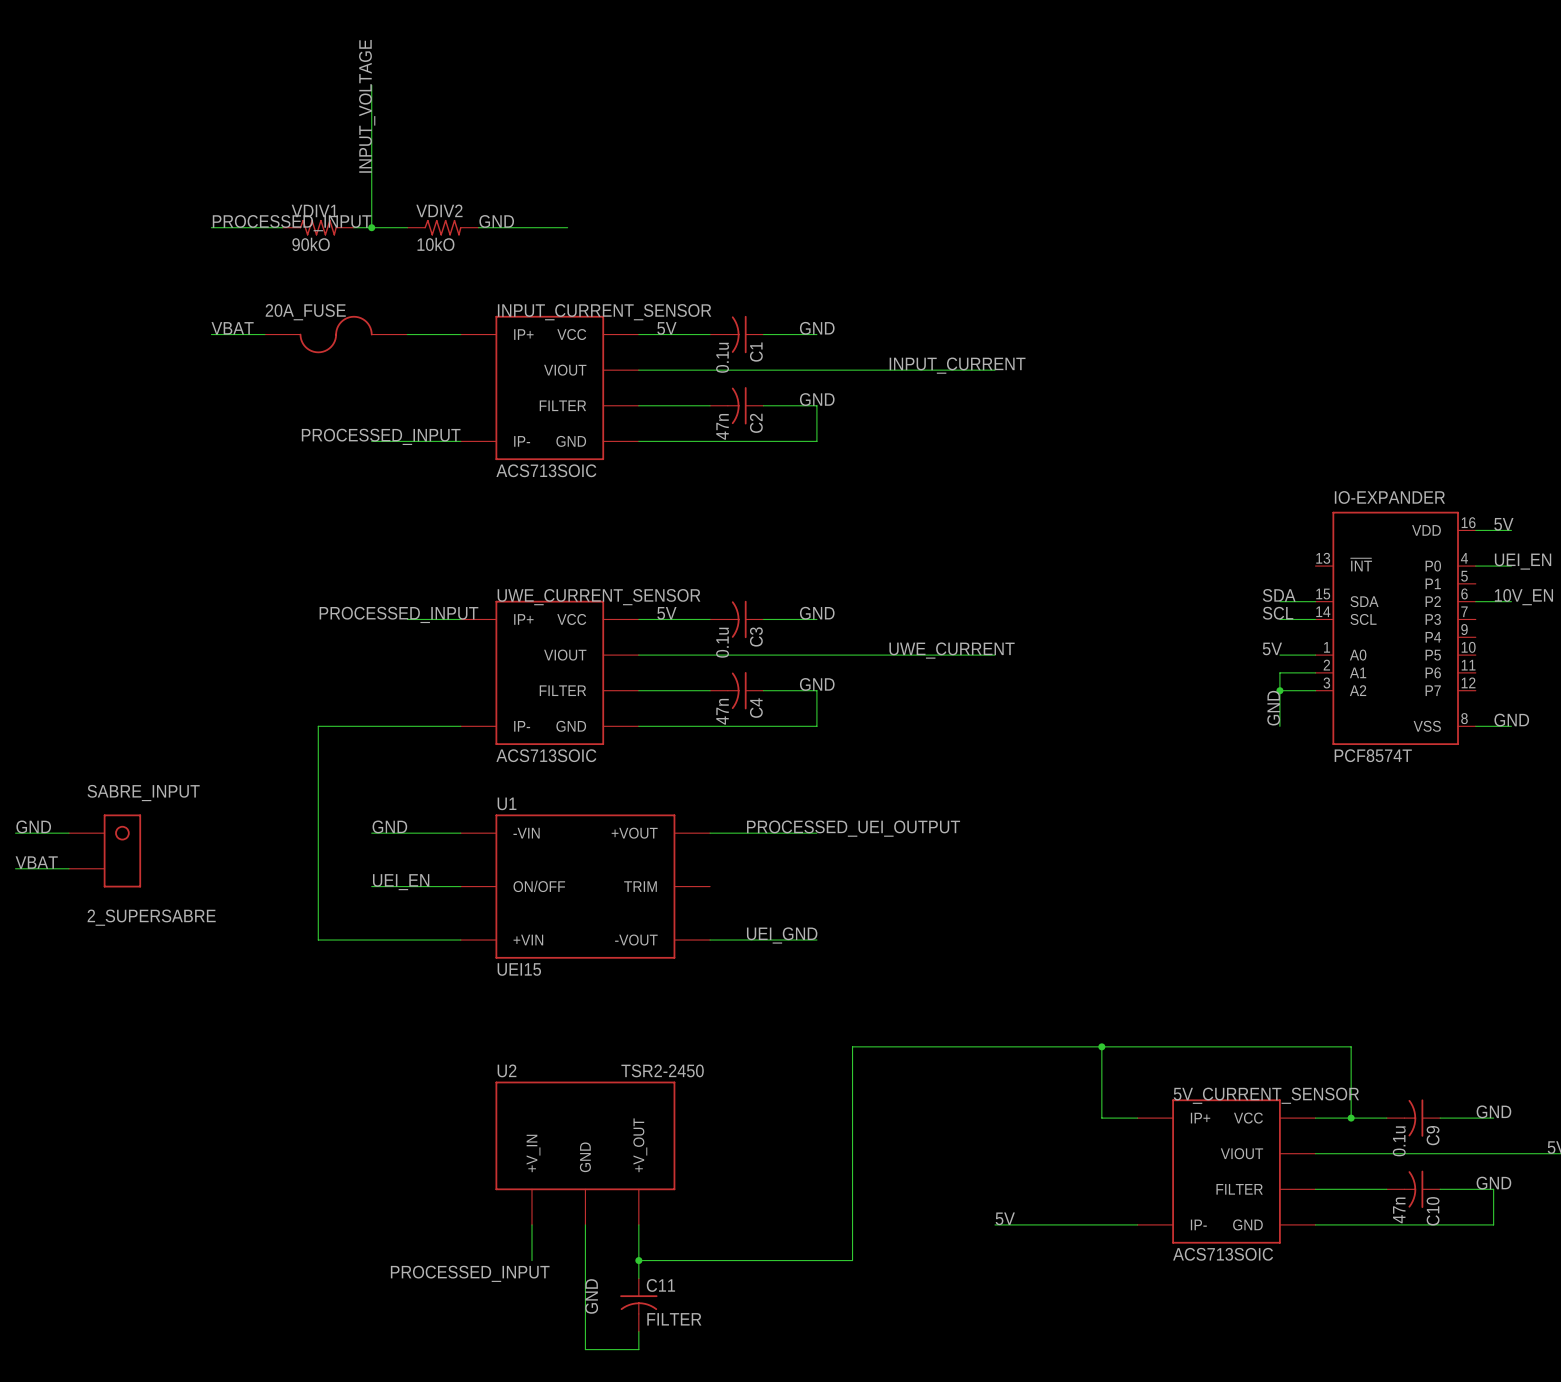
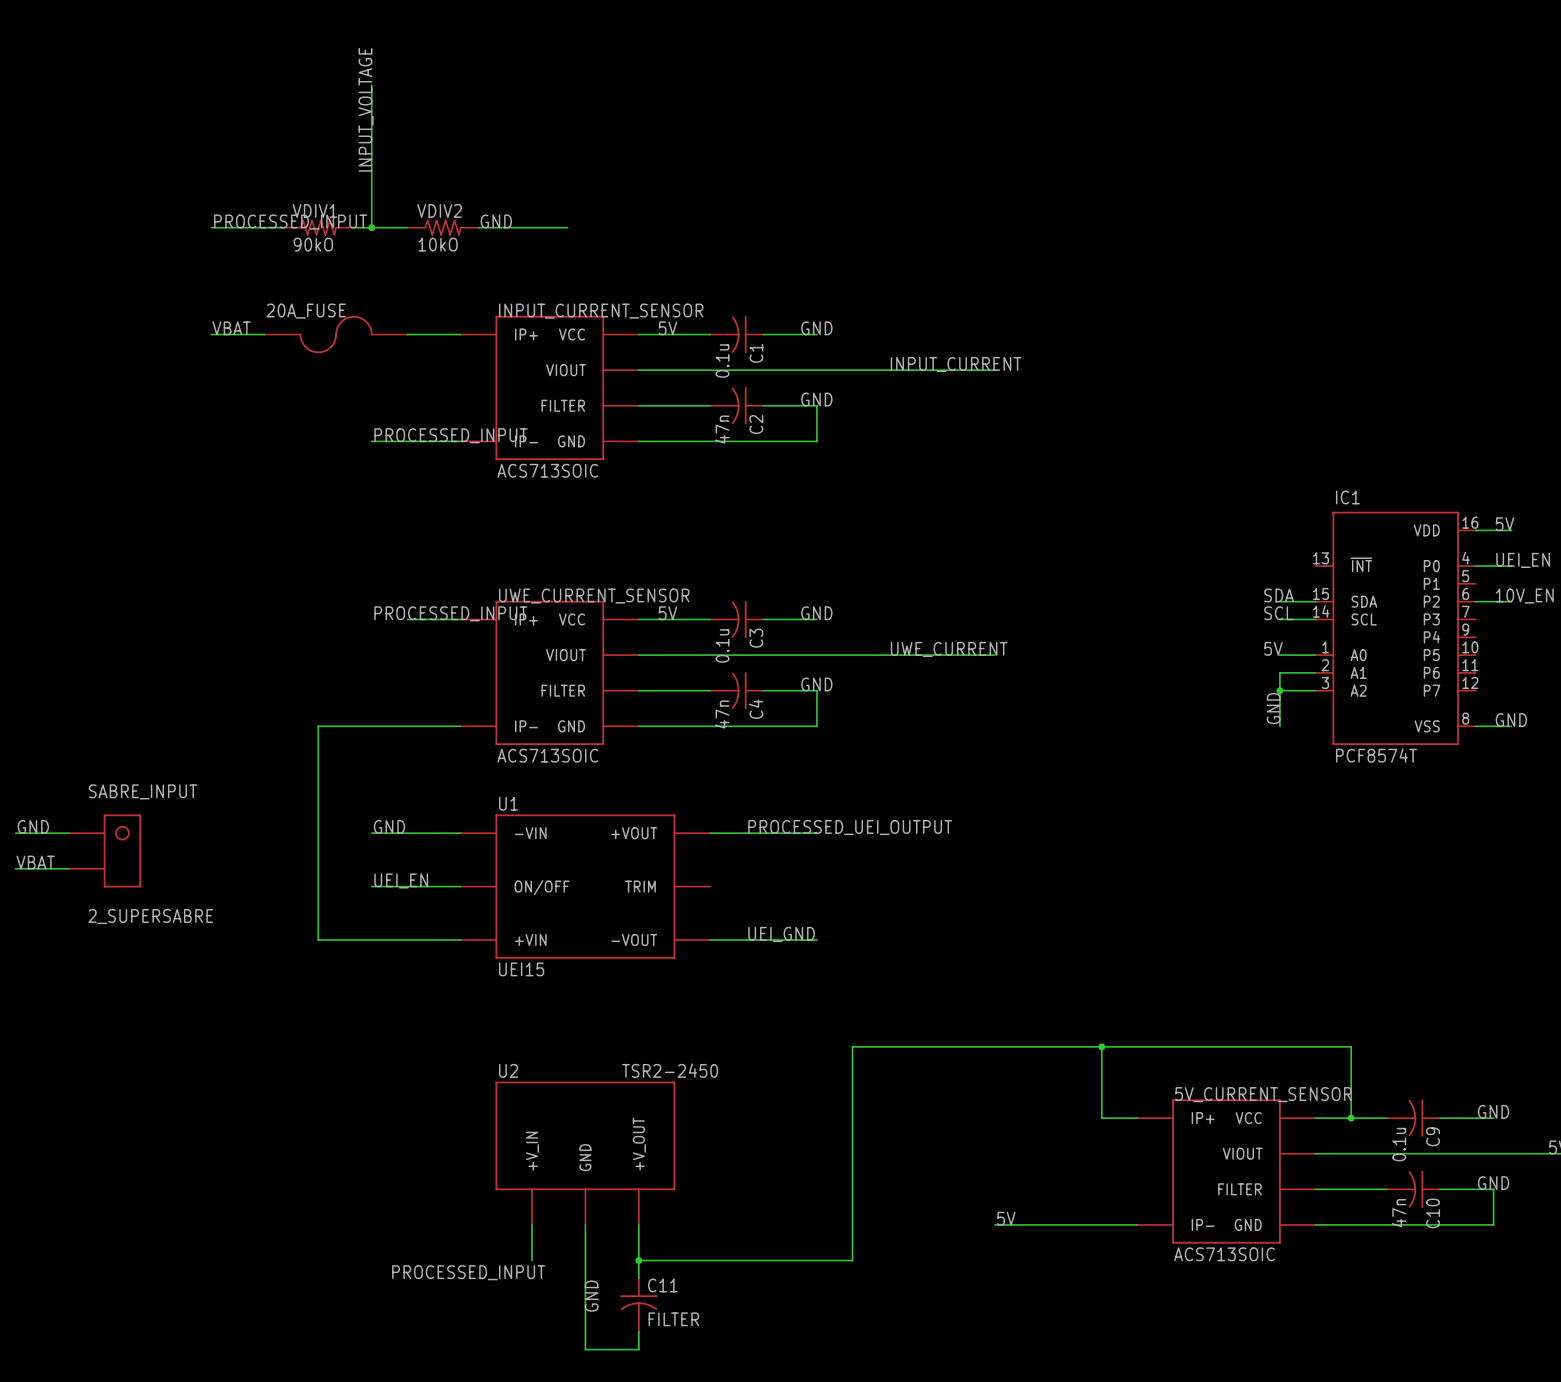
label position: PROCESSED_INPUT (381, 436) -> PROCESSED_INPUT (450, 435)
IO-EXPANDER name: IO-EXPANDER (1389, 497) -> IC1 (1347, 497)
label position: PROCESSED_INPUT (398, 614) -> PROCESSED_INPUT (450, 613)

